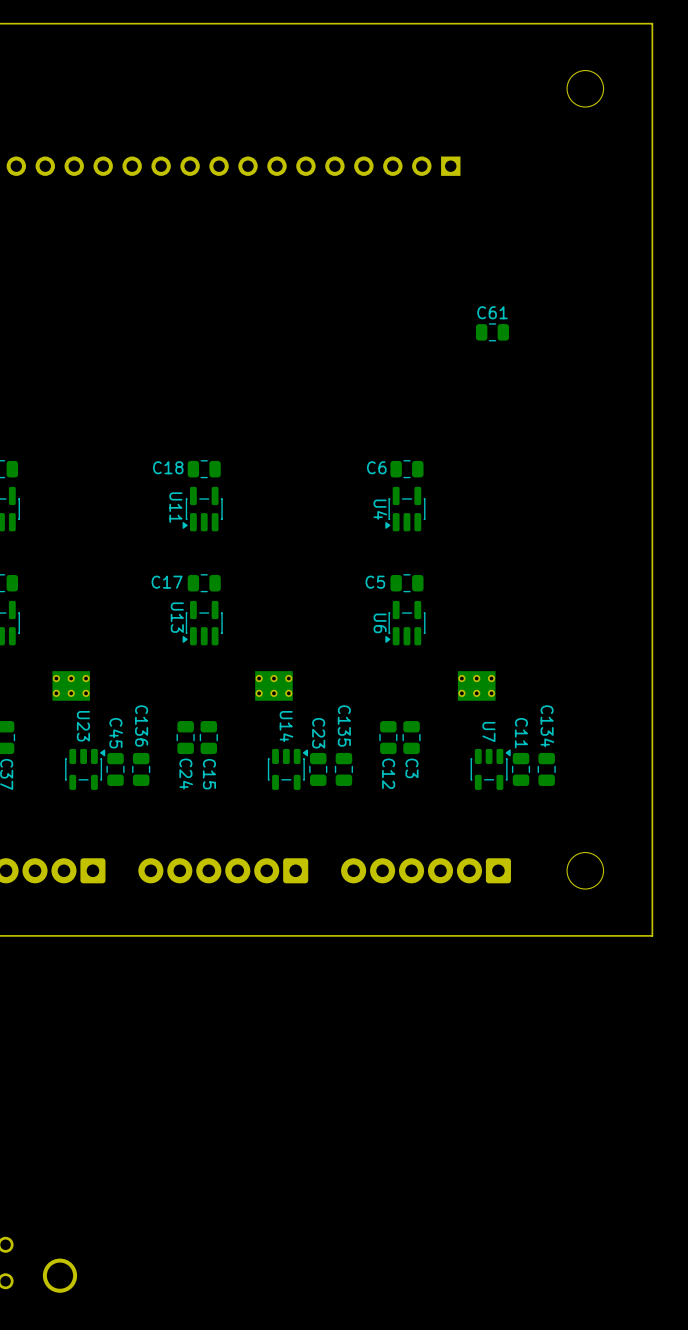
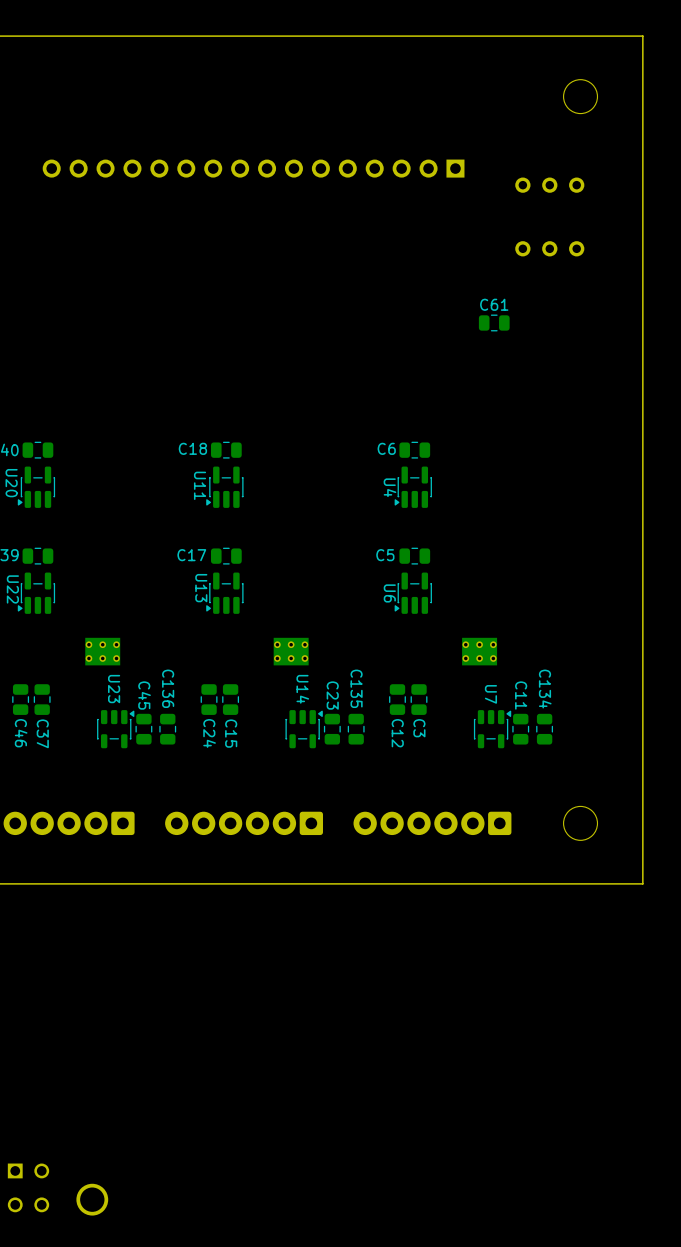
part: none -> (549, 185)
part: none -> (549, 248)

